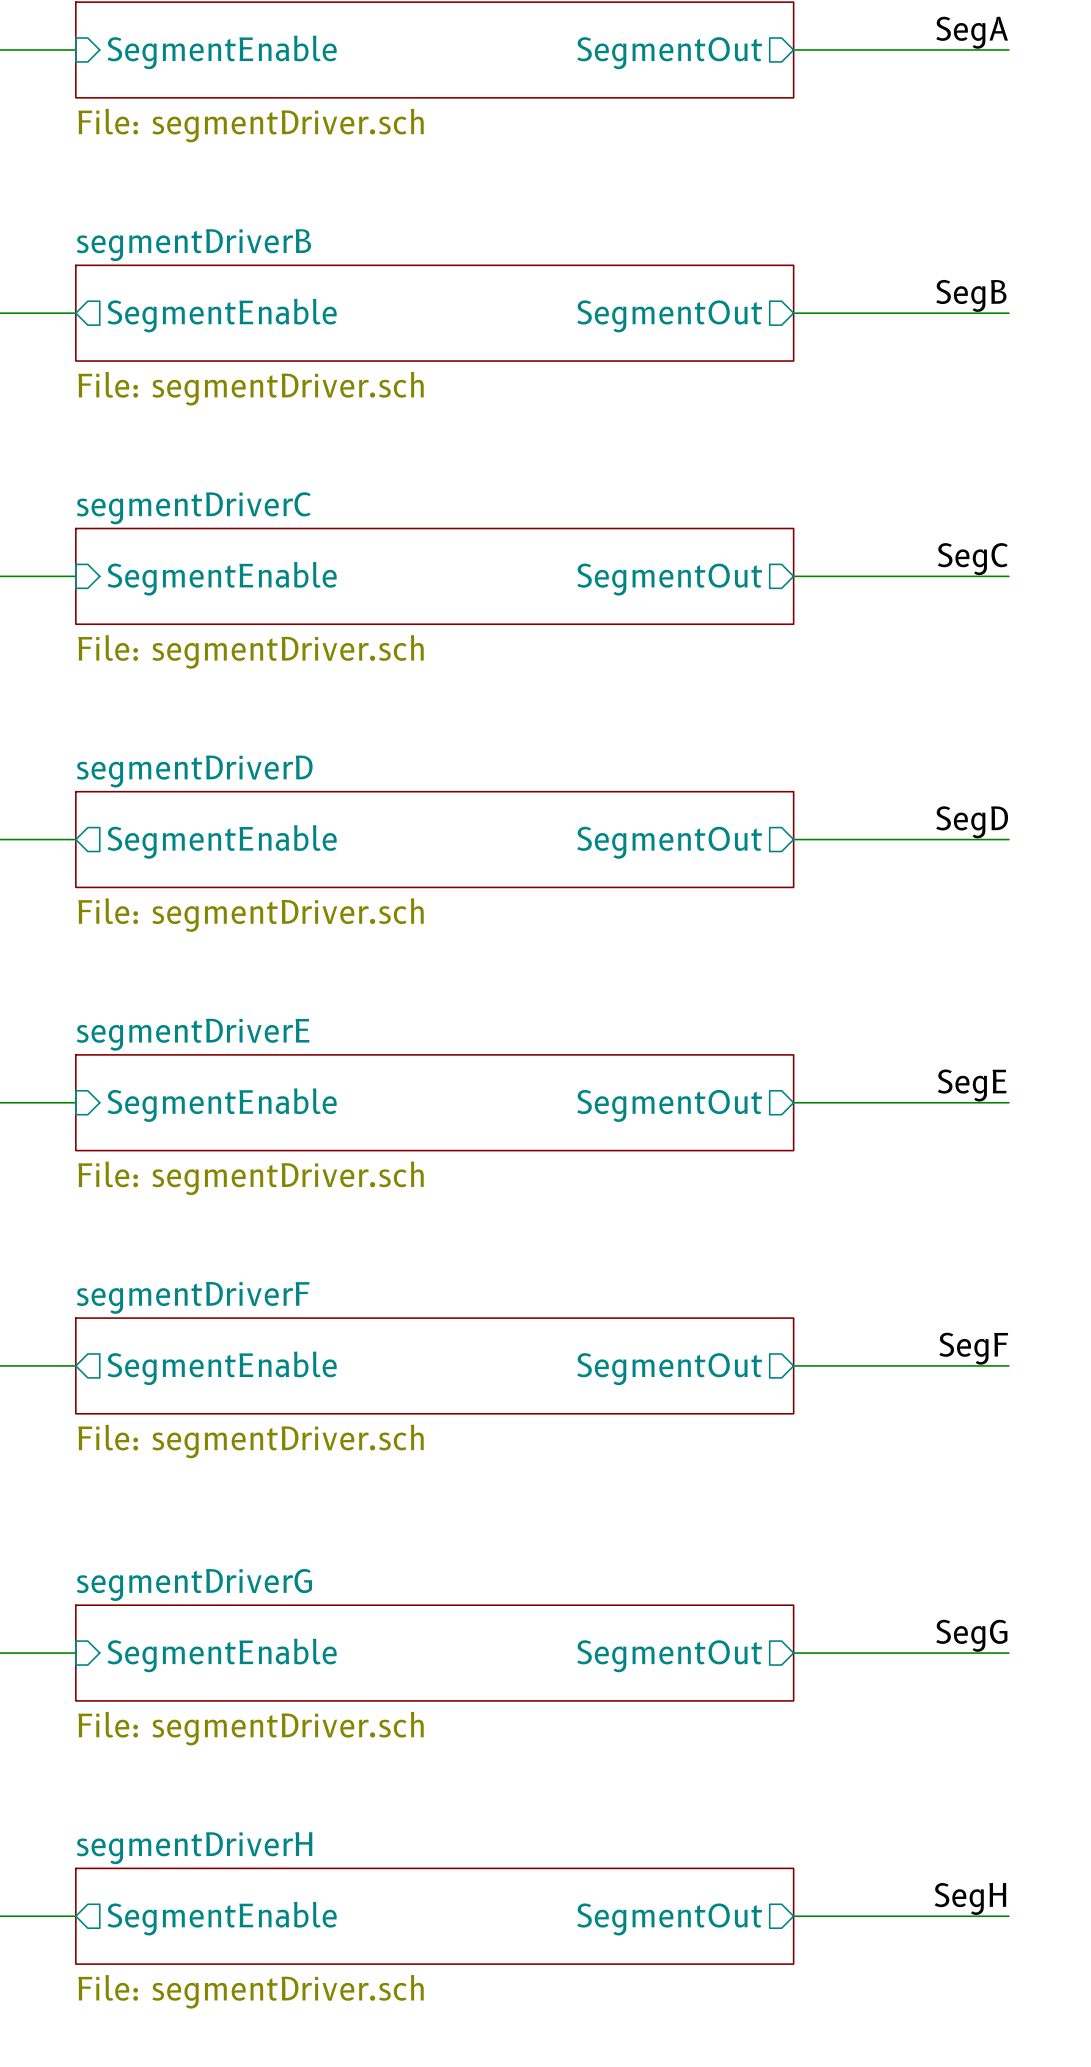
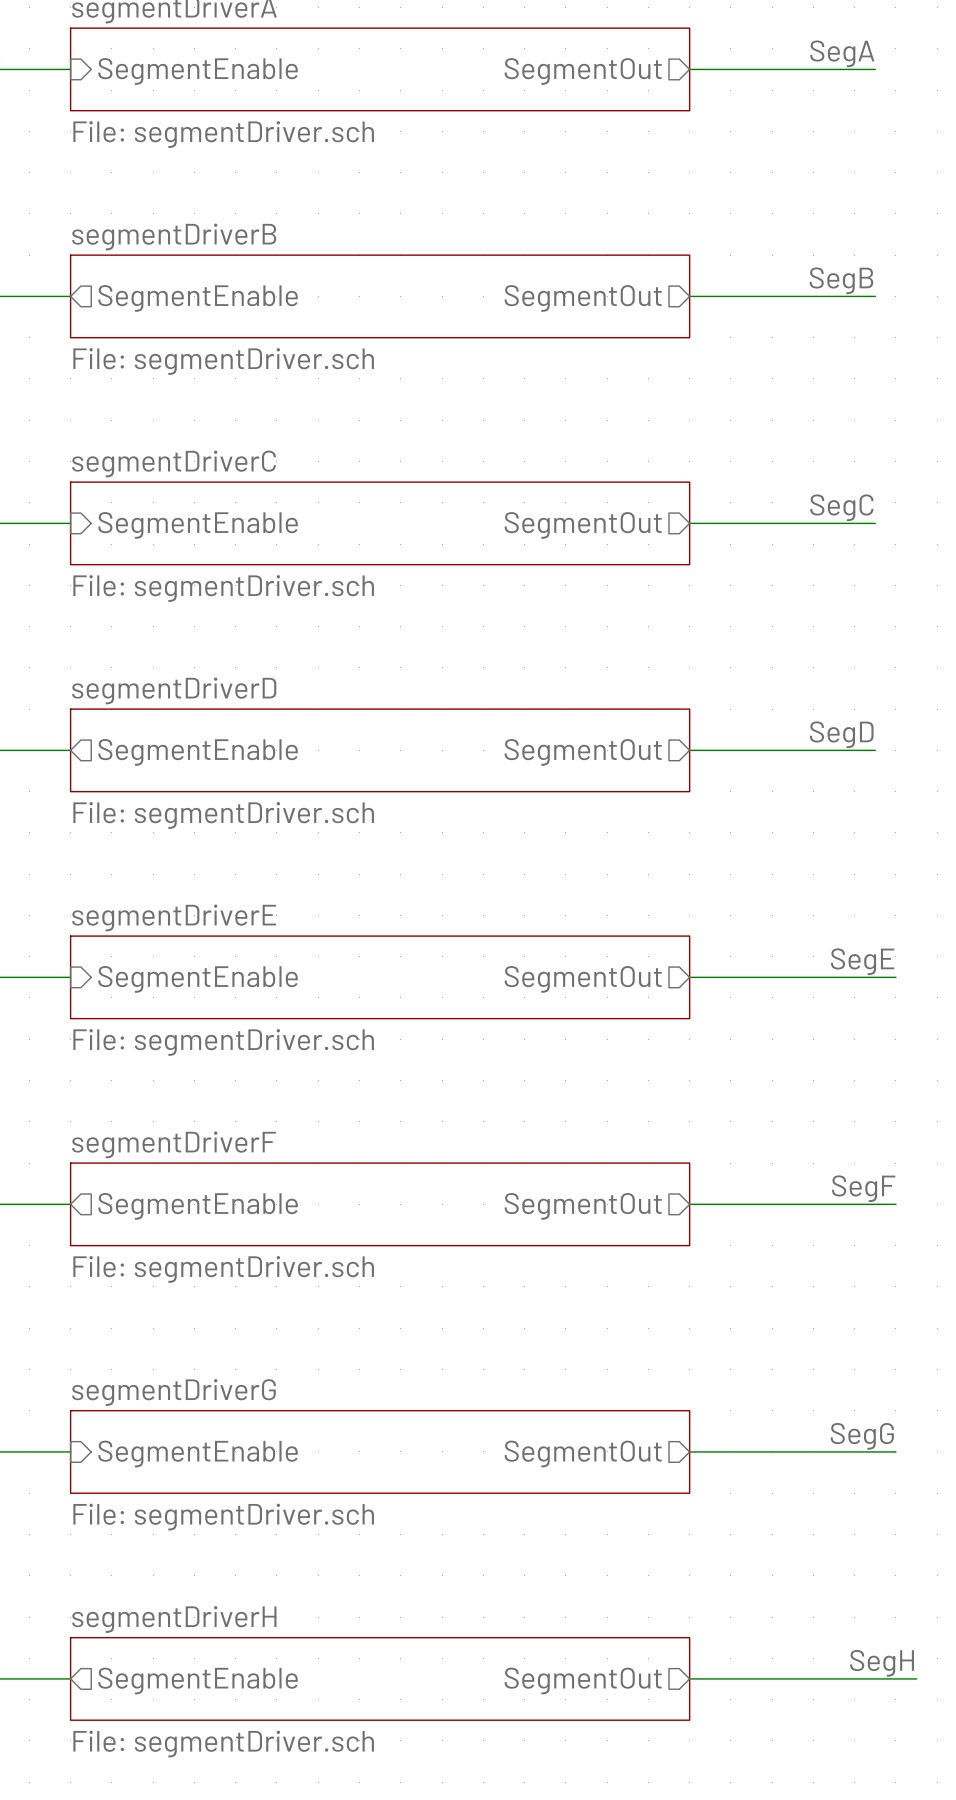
label position: SegE (972, 1085) -> SegE (862, 961)
wire: none -> (875, 977) (895, 977)
label position: SegF (973, 1348) -> SegF (863, 1188)
wire: none -> (875, 1204) (895, 1204)
label position: SegG (971, 1635) -> SegG (862, 1436)
wire: none -> (875, 1451) (895, 1451)
label position: SegH (970, 1898) -> SegH (882, 1663)
wire: none -> (875, 1678) (916, 1678)

